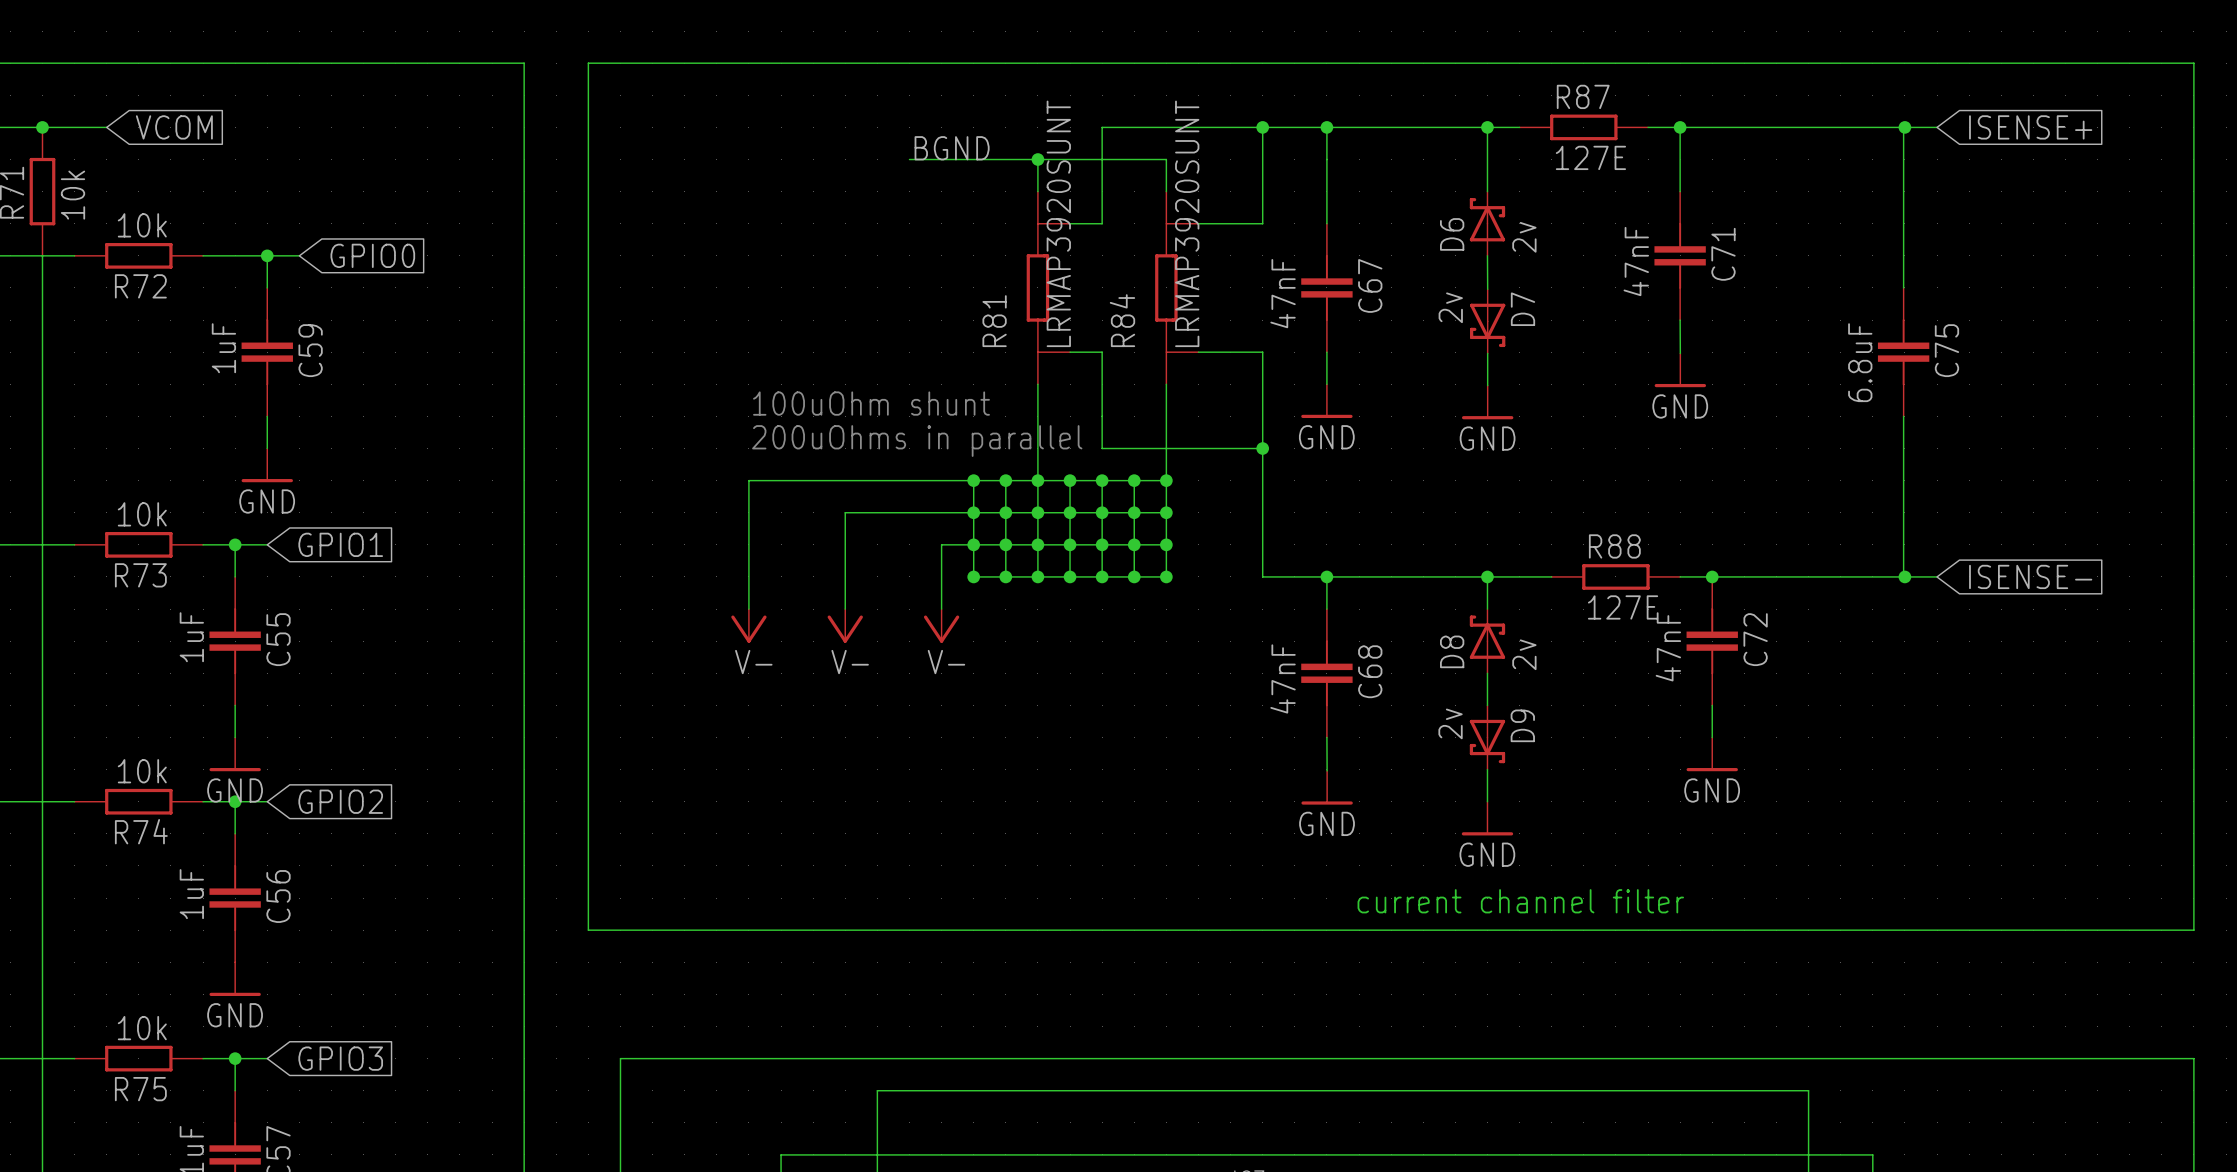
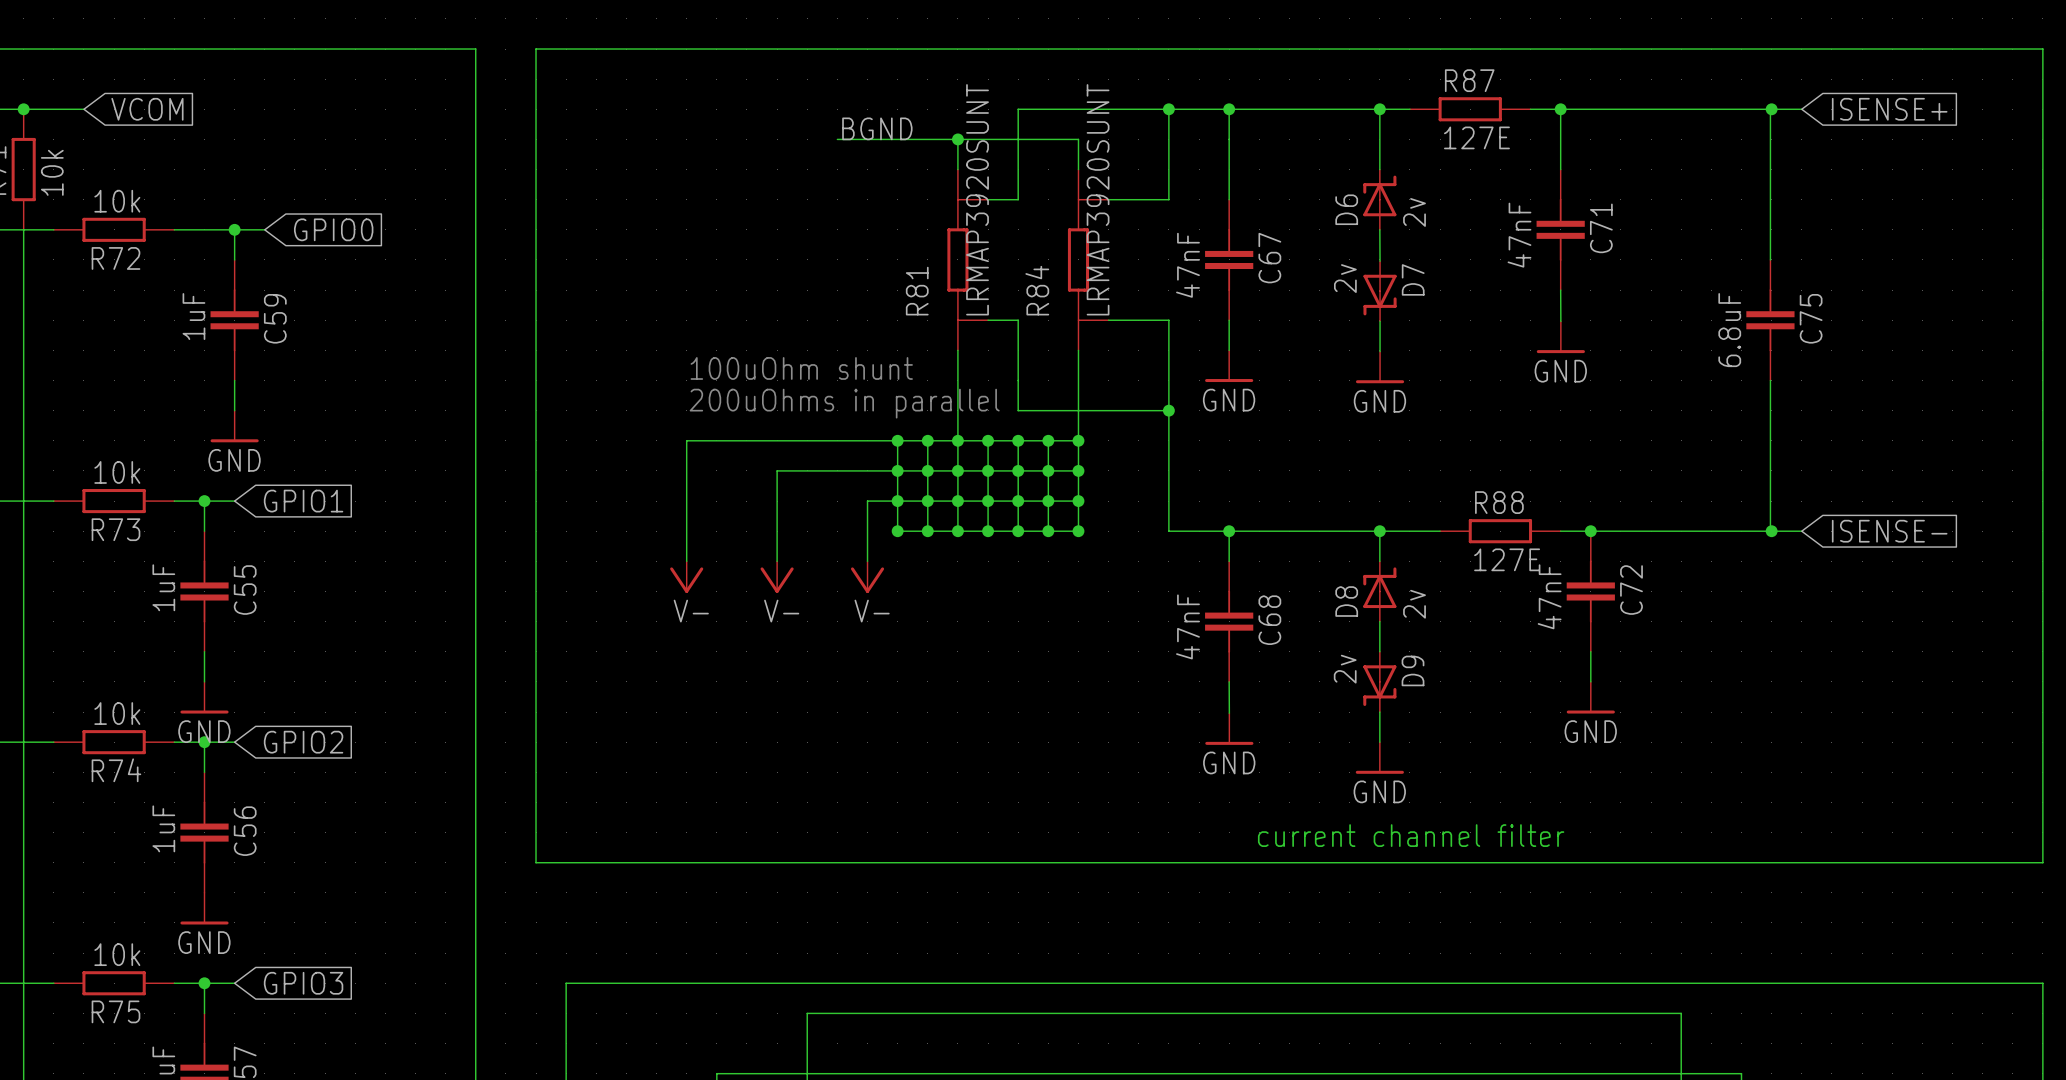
D6 symbol: [1469, 191, 1506, 256] -> [1363, 169, 1397, 230]
D7 symbol: [1470, 289, 1506, 354] -> [1363, 261, 1397, 322]
D8 symbol: [1469, 609, 1506, 674] -> [1363, 561, 1397, 622]
D9 symbol: [1469, 705, 1506, 770] -> [1363, 651, 1397, 713]

